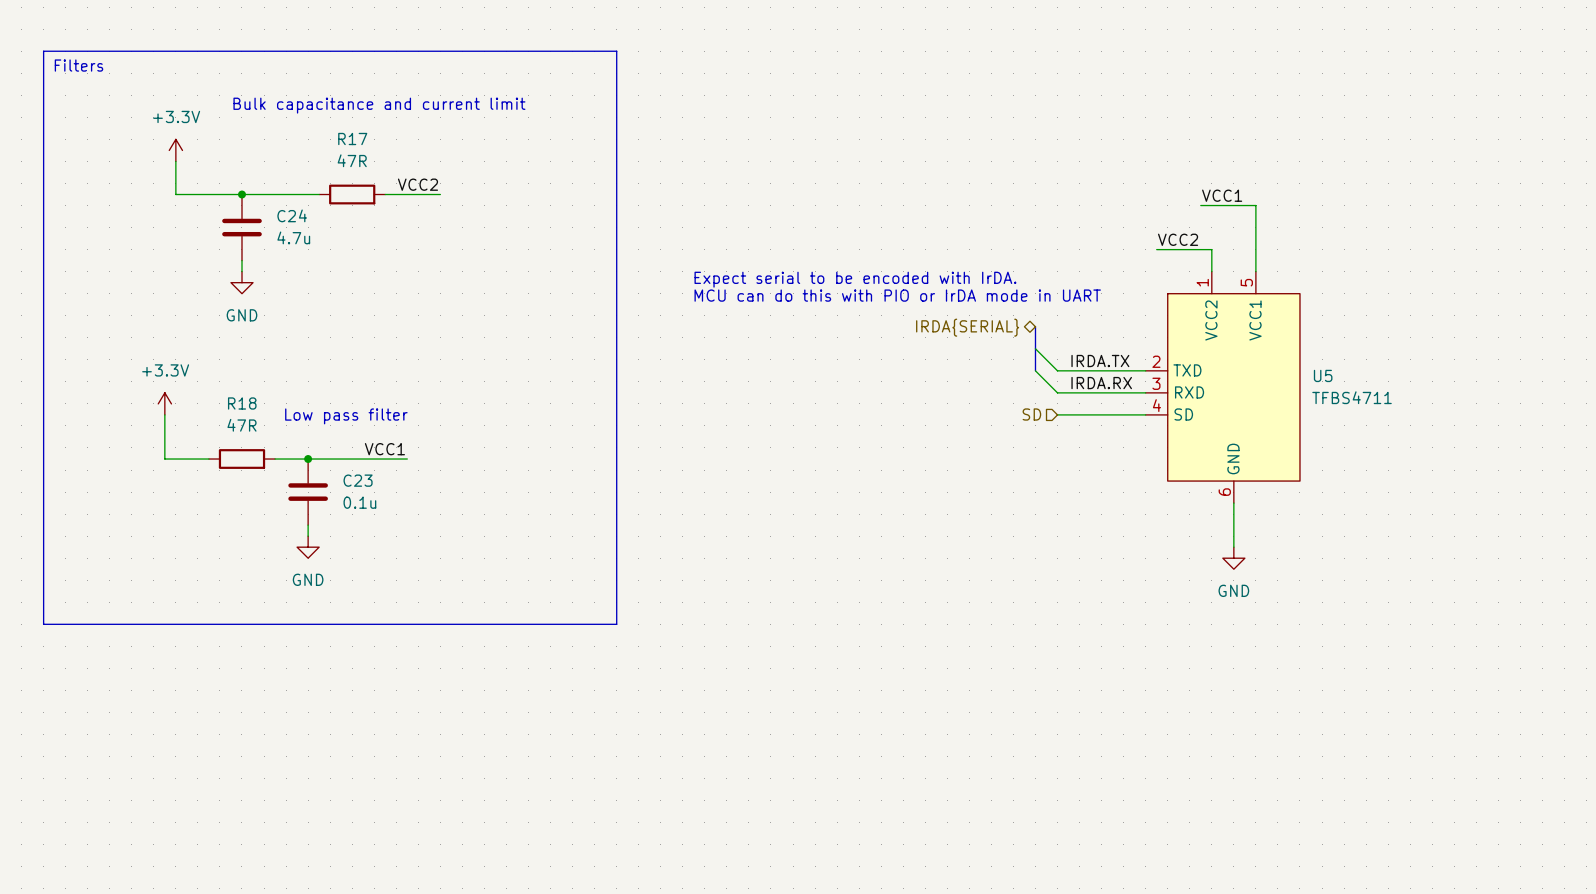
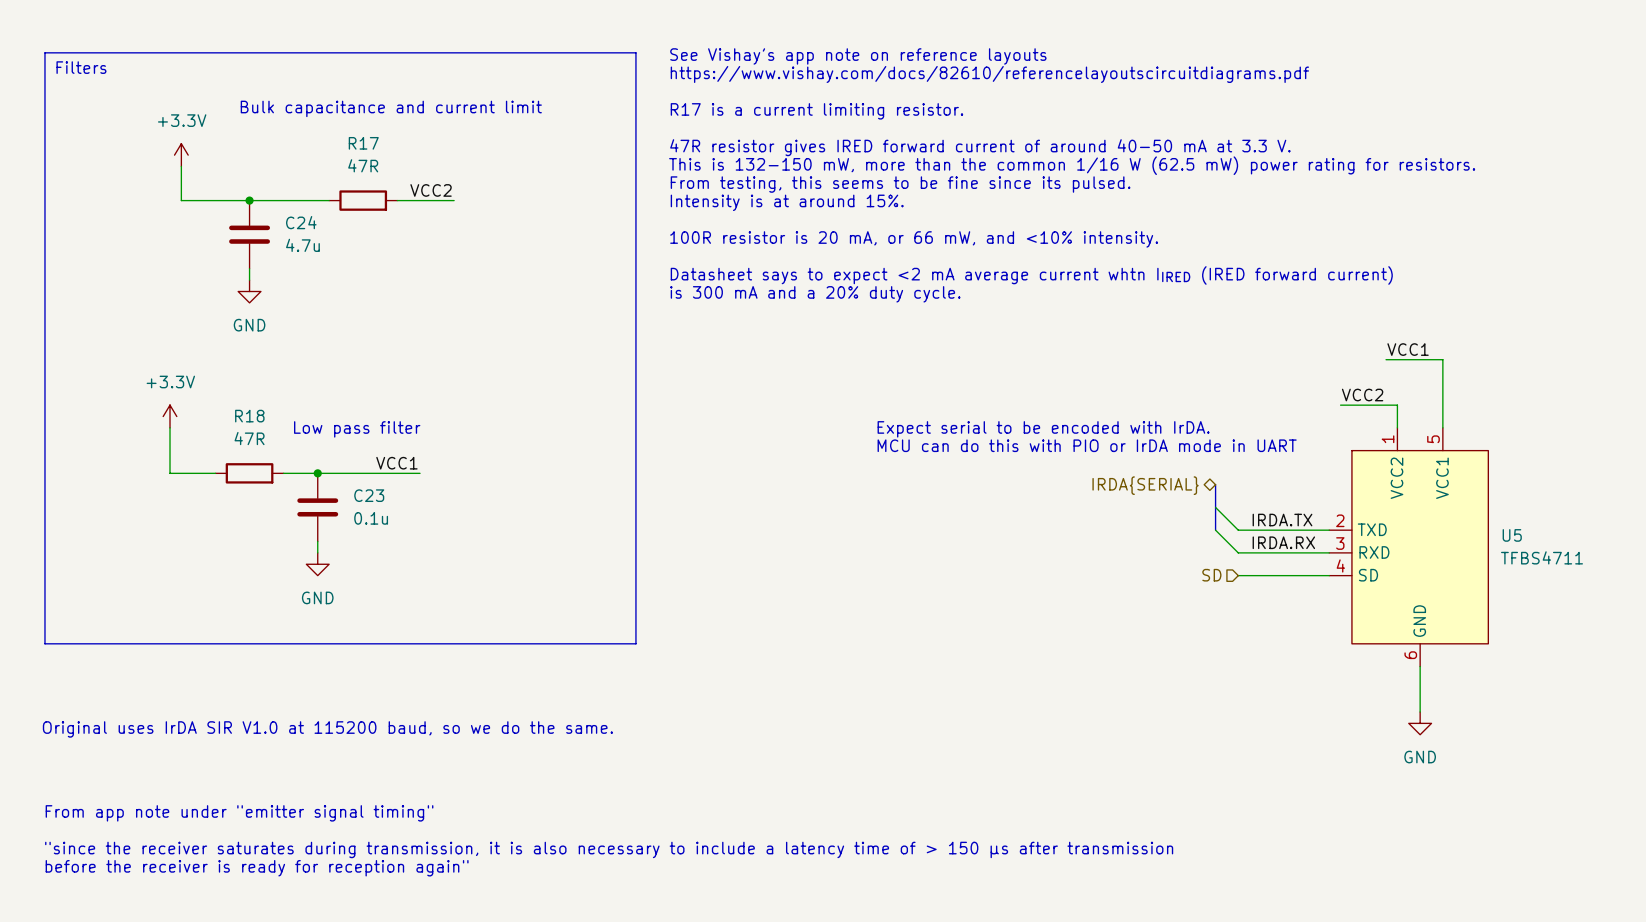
text: none -> See Vishay's app note on reference layouts (858, 56)
text: none -> https://www.vishay.com/docs/82610/referencelayoutscircuitdiagrams.pdf (989, 74)
text: none -> R17 is a current limiting resistor. (816, 111)
text: none -> 47R resistor gives IRED forward current of around 40-50 mA at 3.3 V. (980, 147)
text: none -> This is 132-150 mW, more than the common 1/16 W (62.5 mW) power rating for resistors. (1072, 165)
text: none -> From testing, this seems to be fine since its pulsed. (900, 184)
label position: VCC1 (1222, 195) -> VCC1 (1408, 349)
text: none -> Intensity is at around 15%. (787, 202)
wire: (1200, 205) (1255, 205) (1255, 271) -> (1386, 359) (1442, 359) (1442, 427)
text: none -> 100R resistor is 20 mA, or 66 mW, and <10% intensity. (914, 239)
label position: VCC2 (1178, 239) -> VCC2 (1362, 395)
wire: (1156, 249) (1211, 249) (1211, 271) -> (1340, 405) (1397, 405) (1397, 427)
text: none -> Datasheet says to expect <2 mA average current whtn IIRED (IRED forward current) (1031, 275)
text position: Expect serial to be encoded with IrDA. (855, 279) -> Expect serial to be encoded with IrDA. (1043, 429)
text: none -> is 300 mA and a 20% duty cycle. (815, 294)
text position: MCU can do this with PIO or IrDA mode in UART (897, 295) -> MCU can do this with PIO or IrDA mode in UART (1087, 445)
bus: (1035, 326) (1035, 370) -> (1215, 484) (1215, 530)
hierarchical label position: IRDA{SERIAL} (967, 327) -> IRDA{SERIAL} (1145, 485)
wire: (1035, 348) (1057, 370) (1145, 370) -> (1215, 507) (1238, 530) (1329, 530)
label position: IRDA.TX (1100, 361) -> IRDA.TX (1282, 520)
wire: (1035, 370) (1057, 392) (1145, 392) -> (1215, 530) (1238, 552) (1329, 552)
label position: IRDA.RX (1101, 383) -> IRDA.RX (1283, 542)
U5 position: (1222, 387) -> (1408, 547)
hierarchical label position: SD (1031, 414) -> SD (1211, 575)
wire: (1057, 414) (1145, 414) -> (1238, 575) (1329, 575)
wire: (1233, 503) (1233, 547) -> (1420, 666) (1420, 712)
power symbol position: GND (1233, 558) -> GND (1420, 723)
text: none -> Original uses IrDA SIR V1.0 at 115200 baud, so we do the same. (327, 729)
text: none -> From app note under "emitter signal timing" (239, 813)
text: none -> "since the receiver saturates during transmission, it is also necessary to include a latency time of > 150 μs after transmission (609, 849)
text: none -> before the receiver is ready for reception again" (257, 868)

